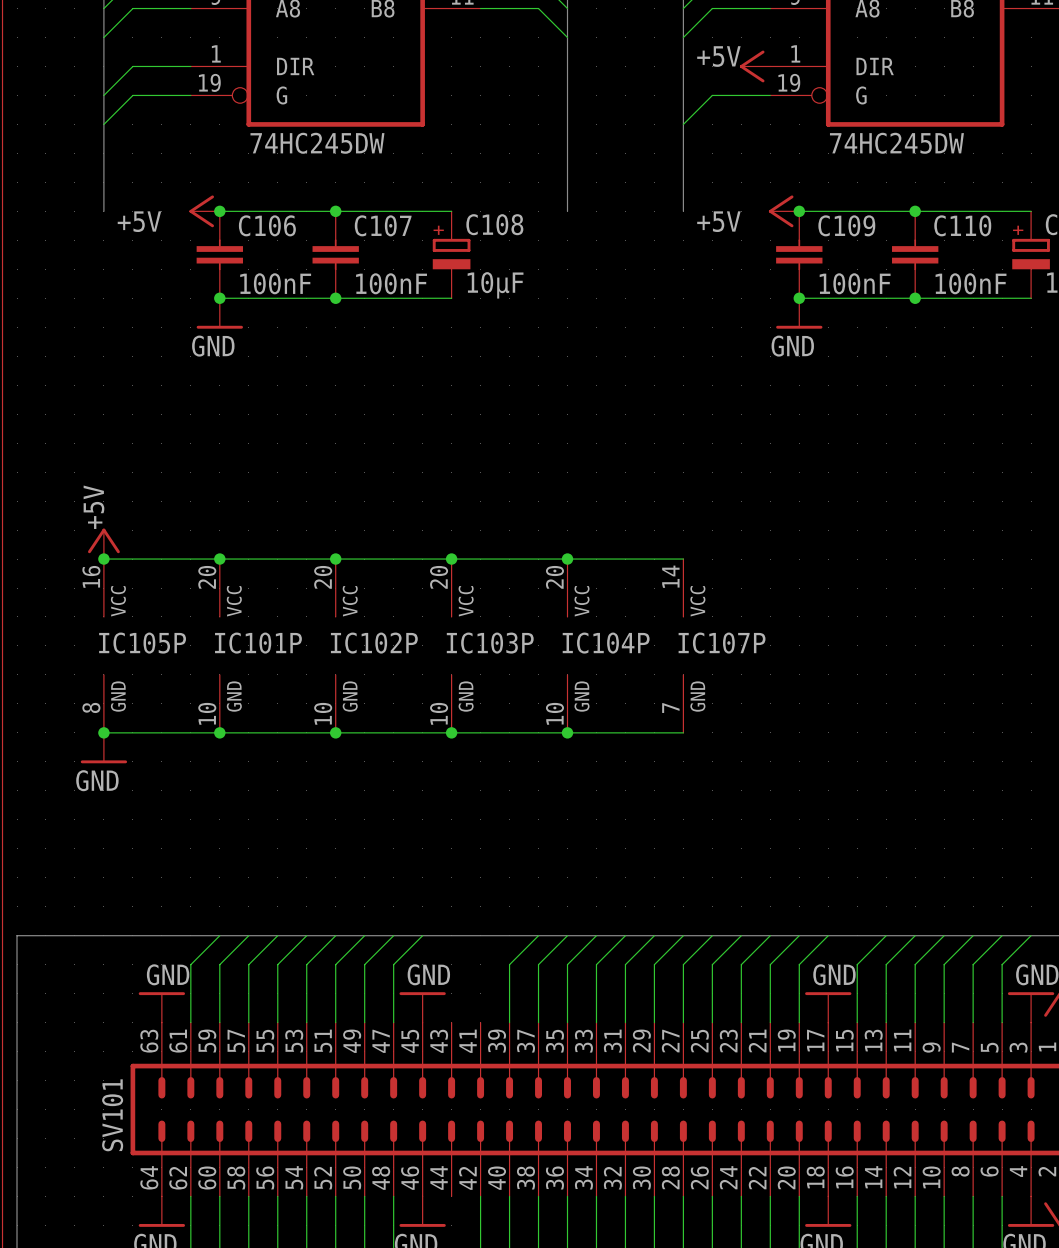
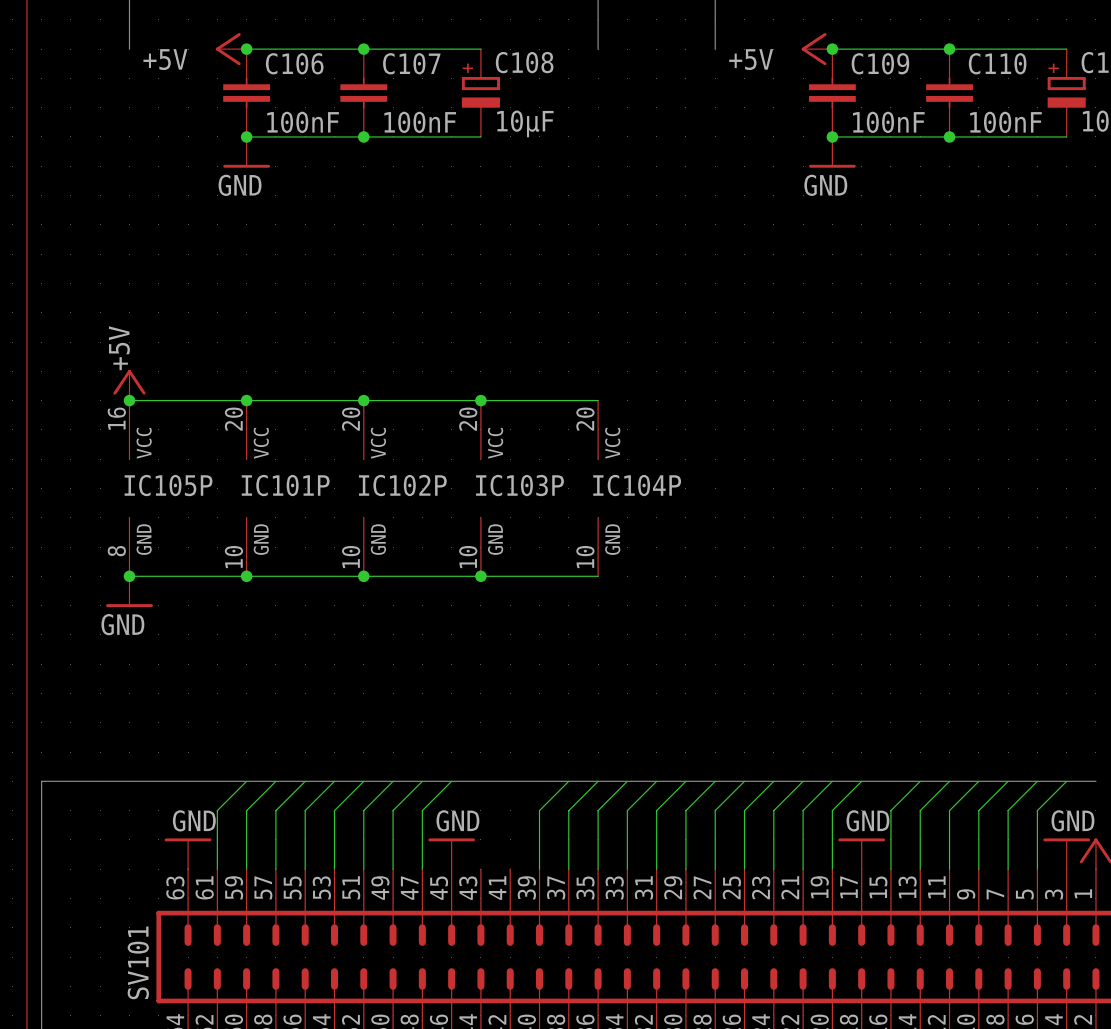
wire: (567, 559) (683, 559) -> none
junction: (567, 559) -> none
IC107P: (683, 645) -> none
wire: (567, 732) (683, 732) -> none
junction: (567, 732) -> none

